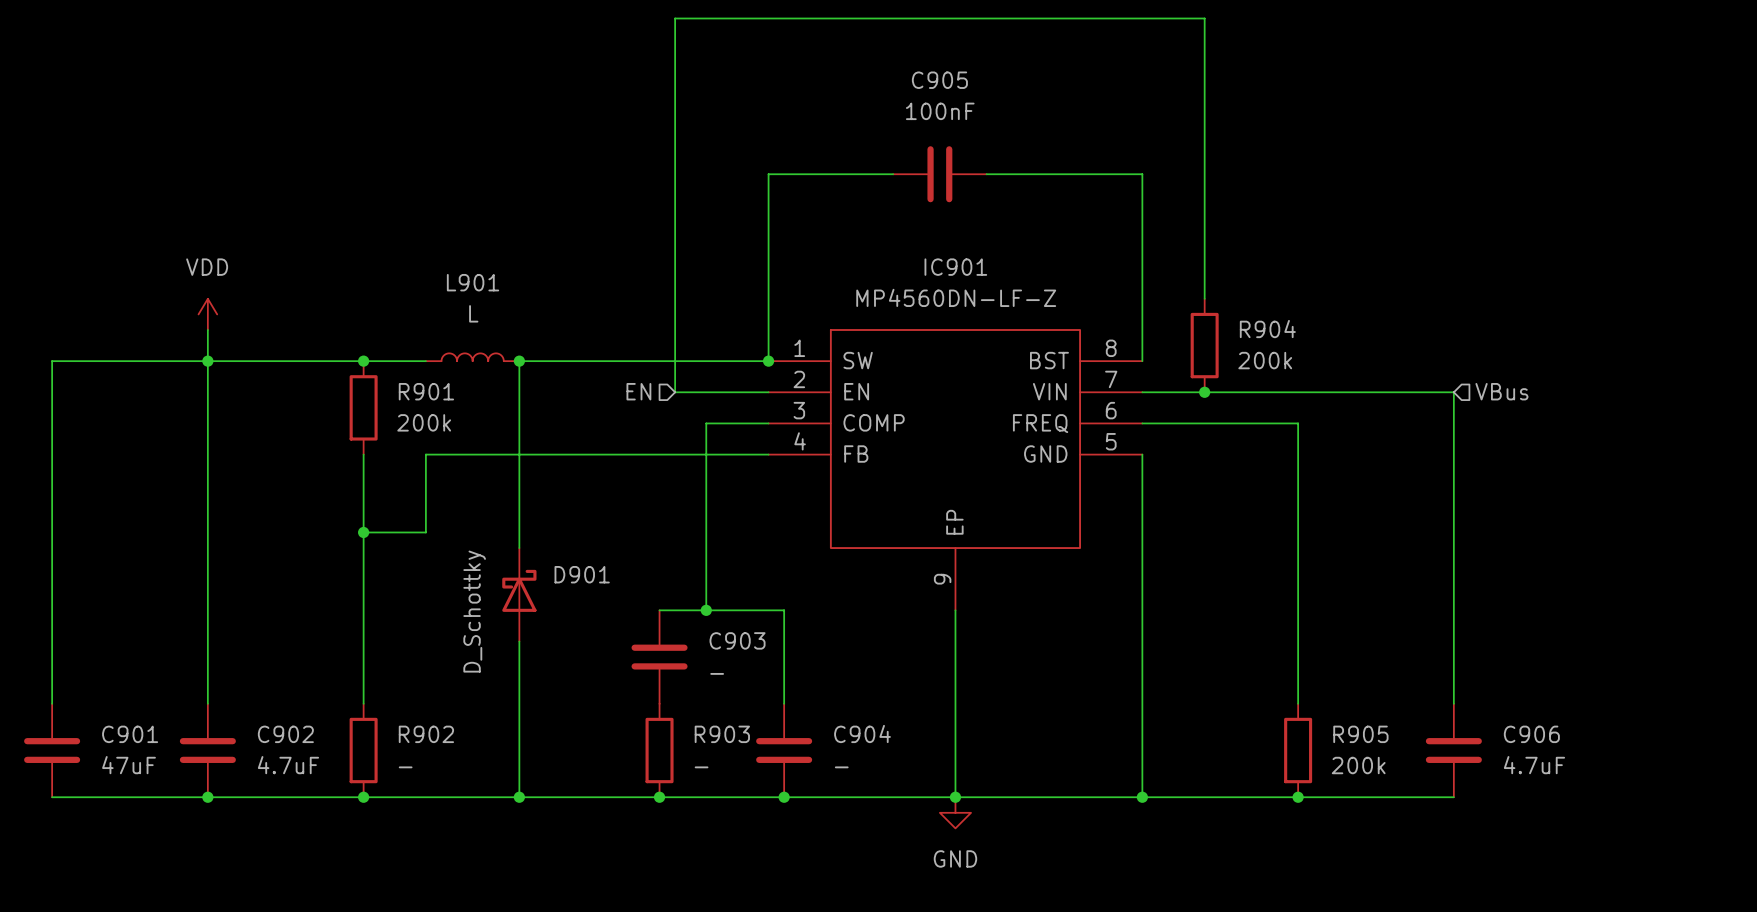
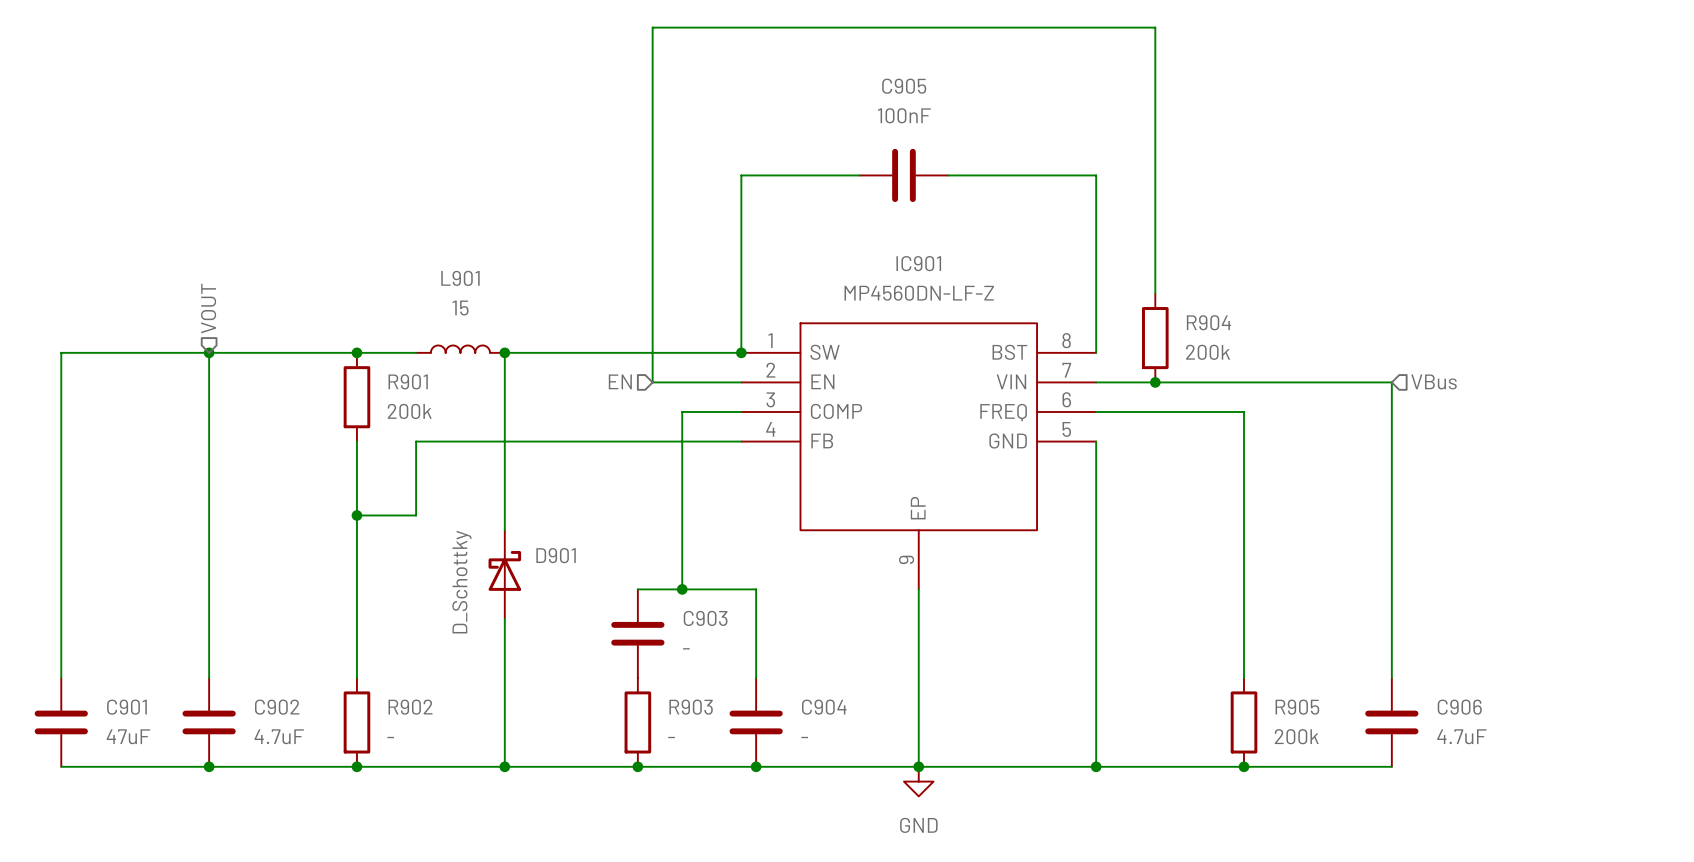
hierarchical label: none -> VOUT (208, 308)
L901 value: L (473, 313) -> 15 (460, 308)
power symbol: VDD (207, 314) -> none
wire: (207, 329) (207, 361) -> none

